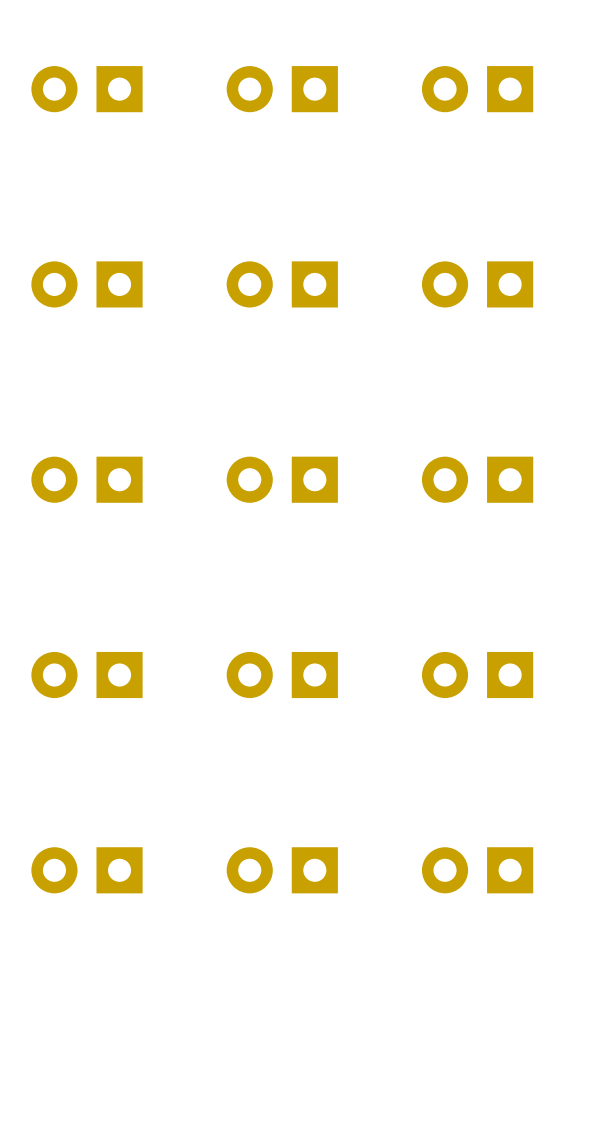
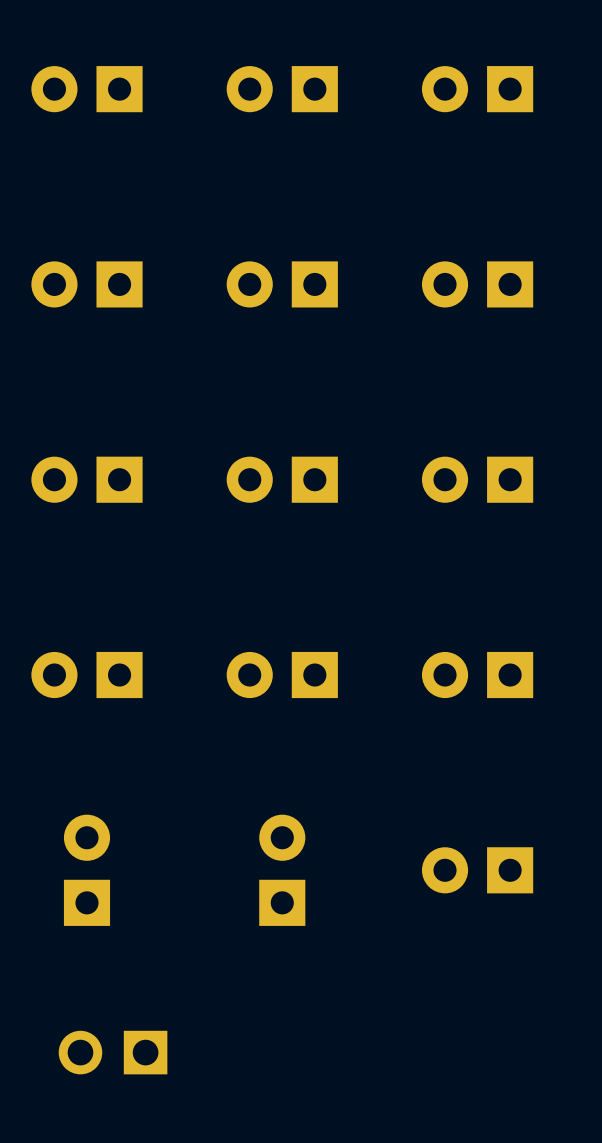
part rotation: 0° (86, 870) -> 90° clockwise (86, 870)
part rotation: 0° (282, 870) -> 90° clockwise (282, 870)
part: none -> (113, 1052)

